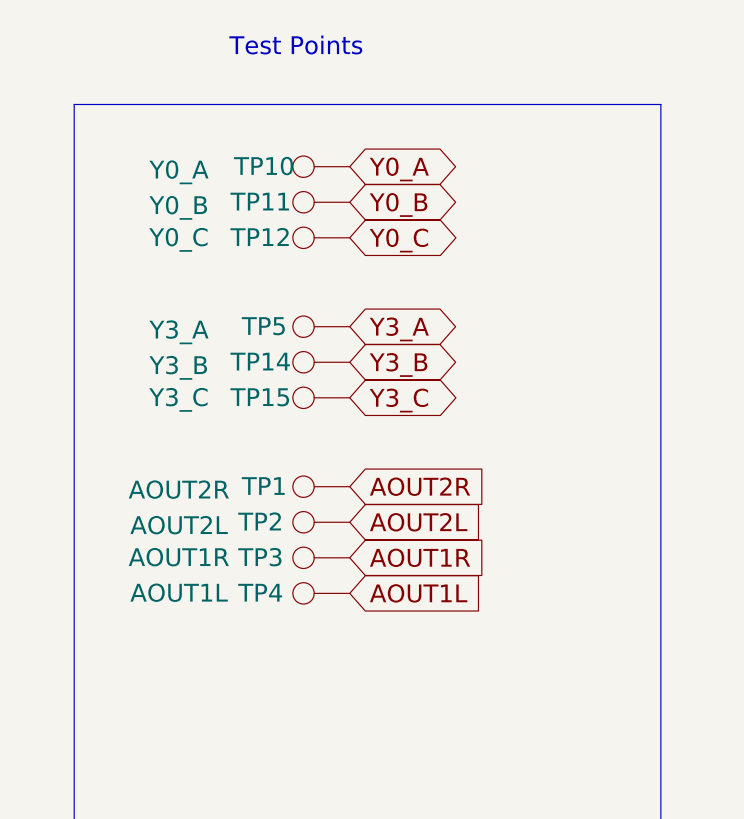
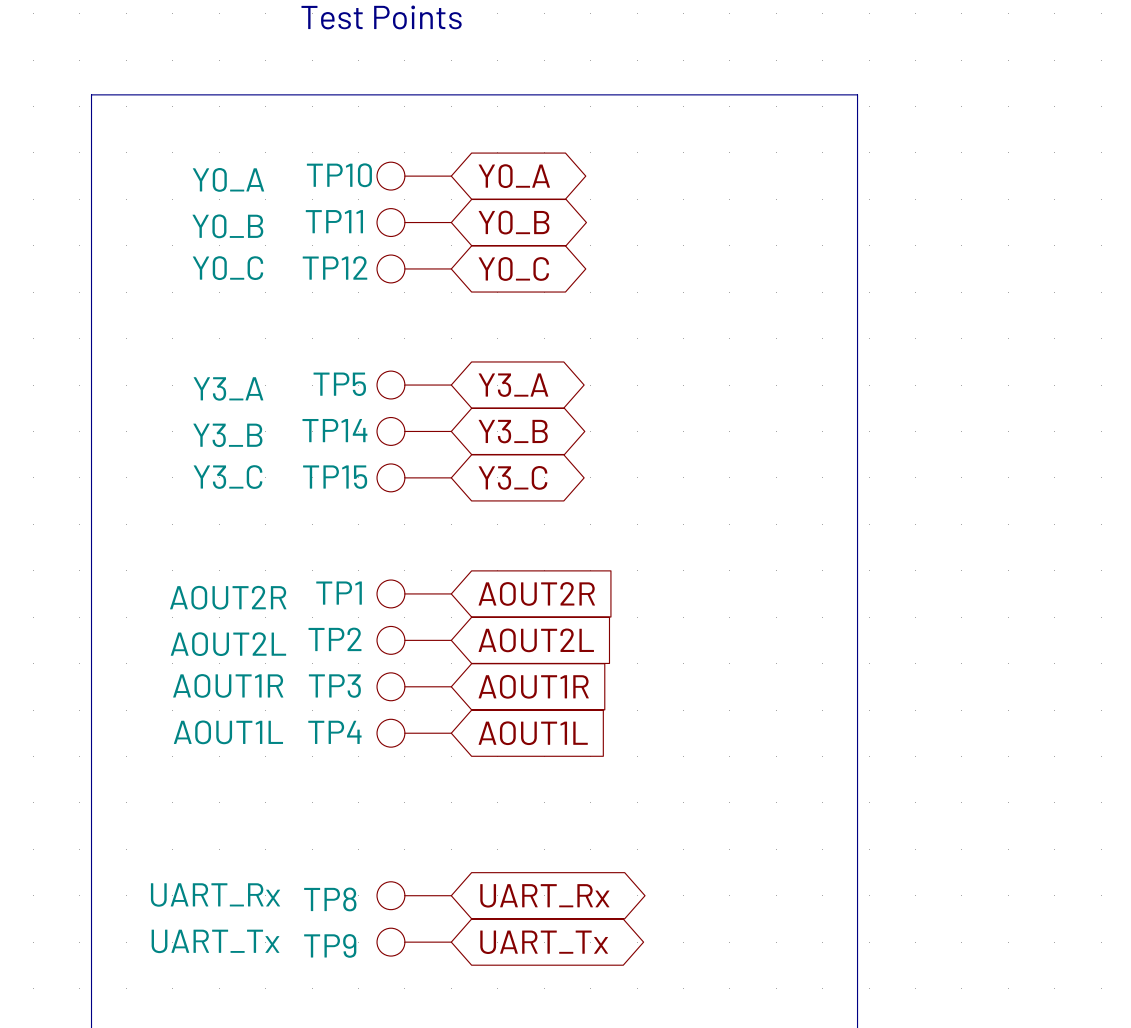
TP8: none -> UART_Rx (414, 895)
global label: none -> UART_Rx (544, 895)
TP9: none -> UART_Tx (414, 942)
global label: none -> UART_Tx (544, 942)

